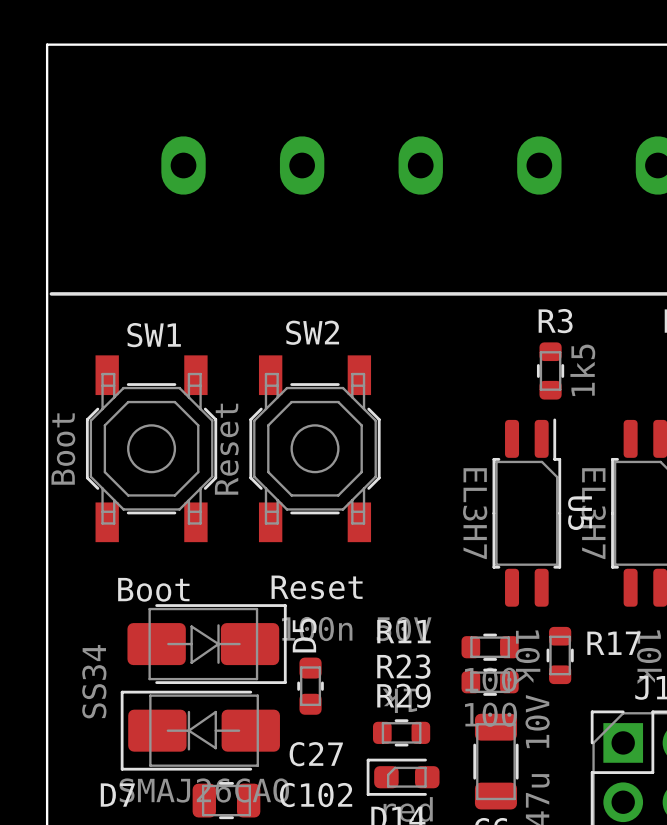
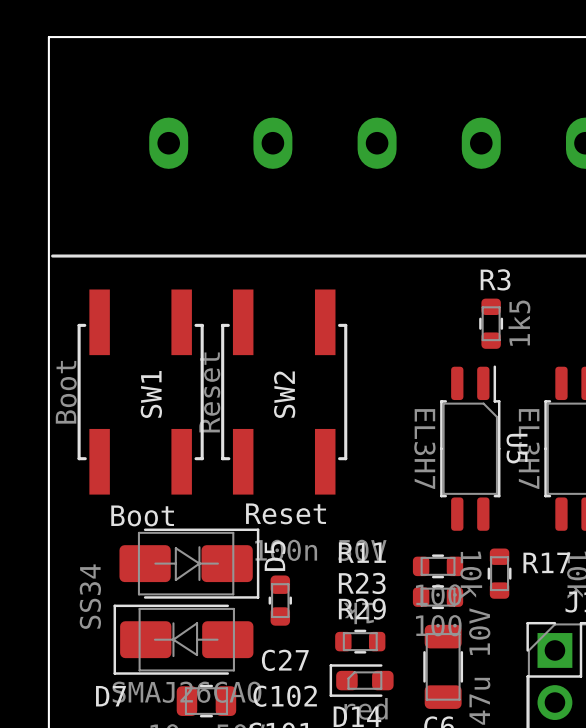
SW2 name position: SW2 (312, 332) -> SW2 (284, 394)
SW1 name position: SW1 (154, 335) -> SW1 (151, 394)
SW1 footprint: [85, 355, 218, 543] -> [77, 289, 204, 495]
SW2 footprint: [249, 355, 381, 543] -> [221, 289, 348, 495]

